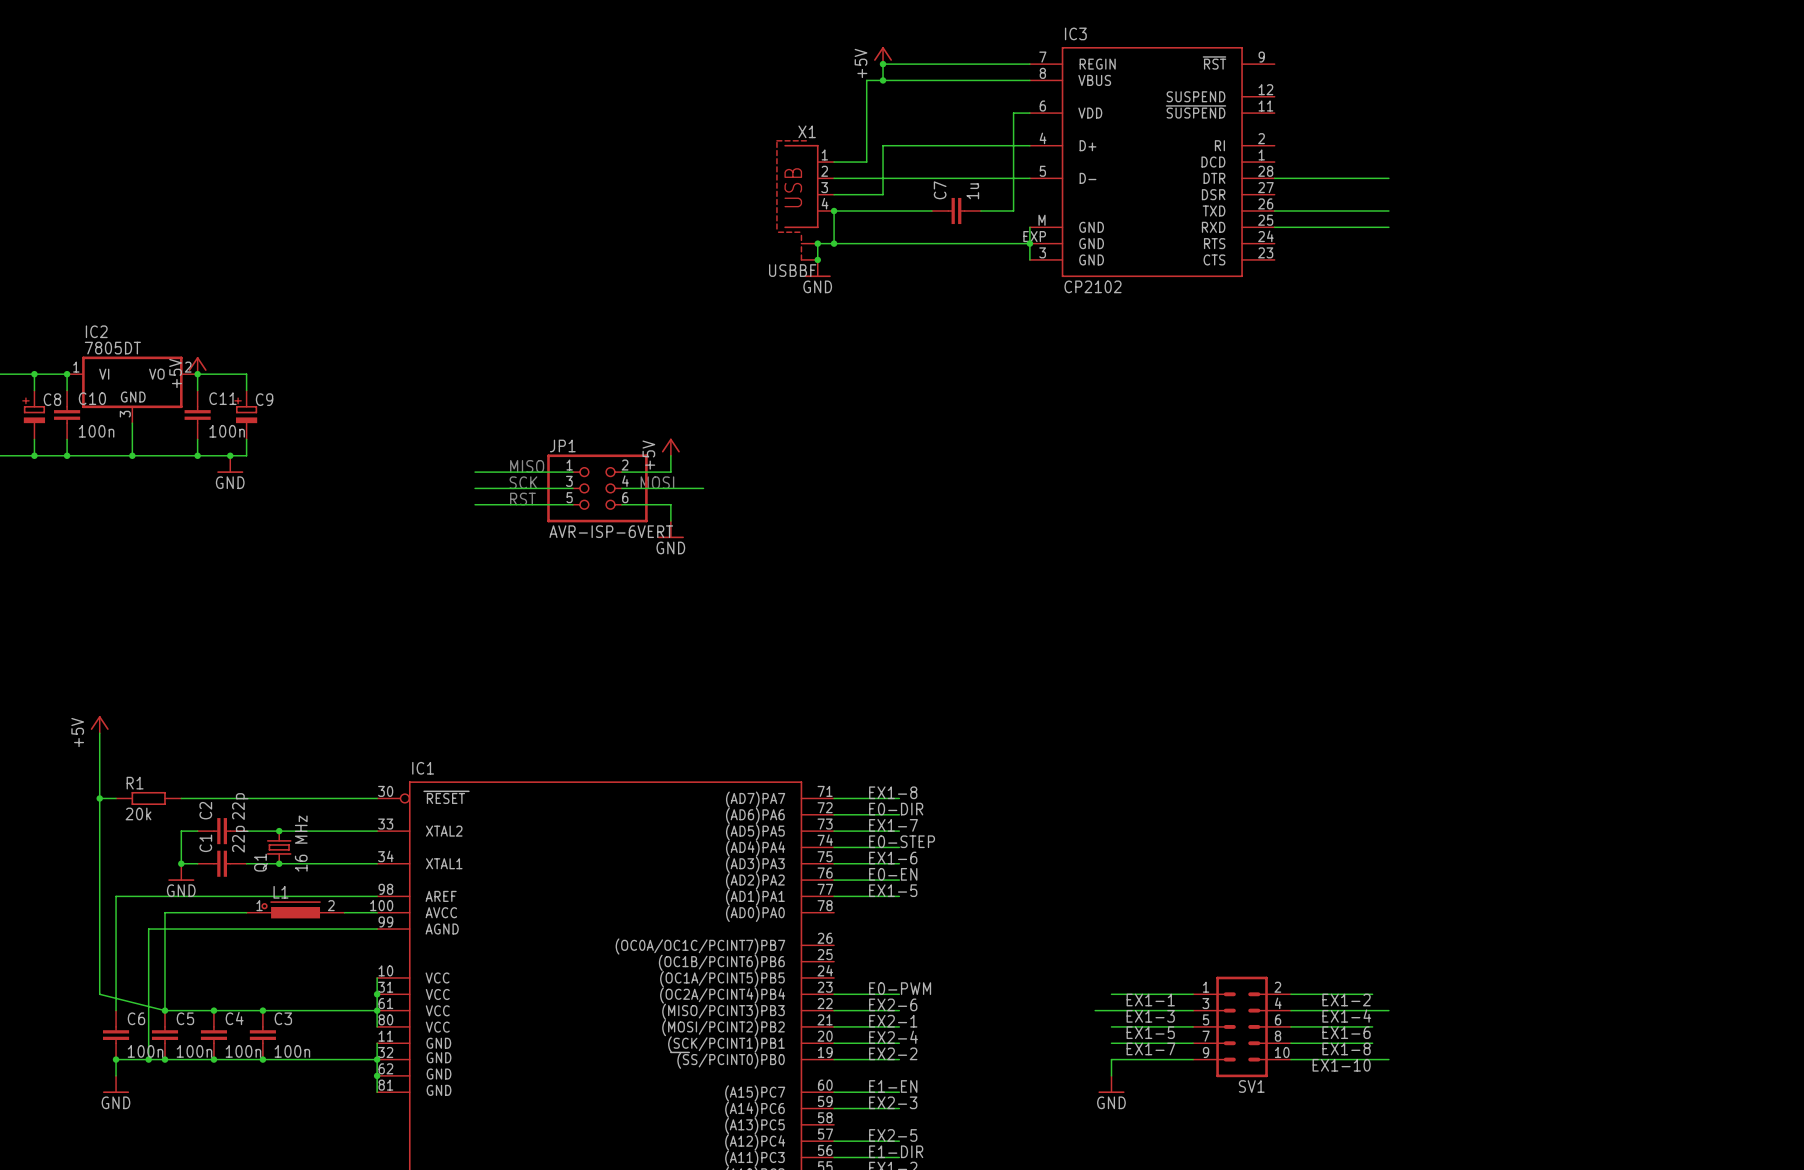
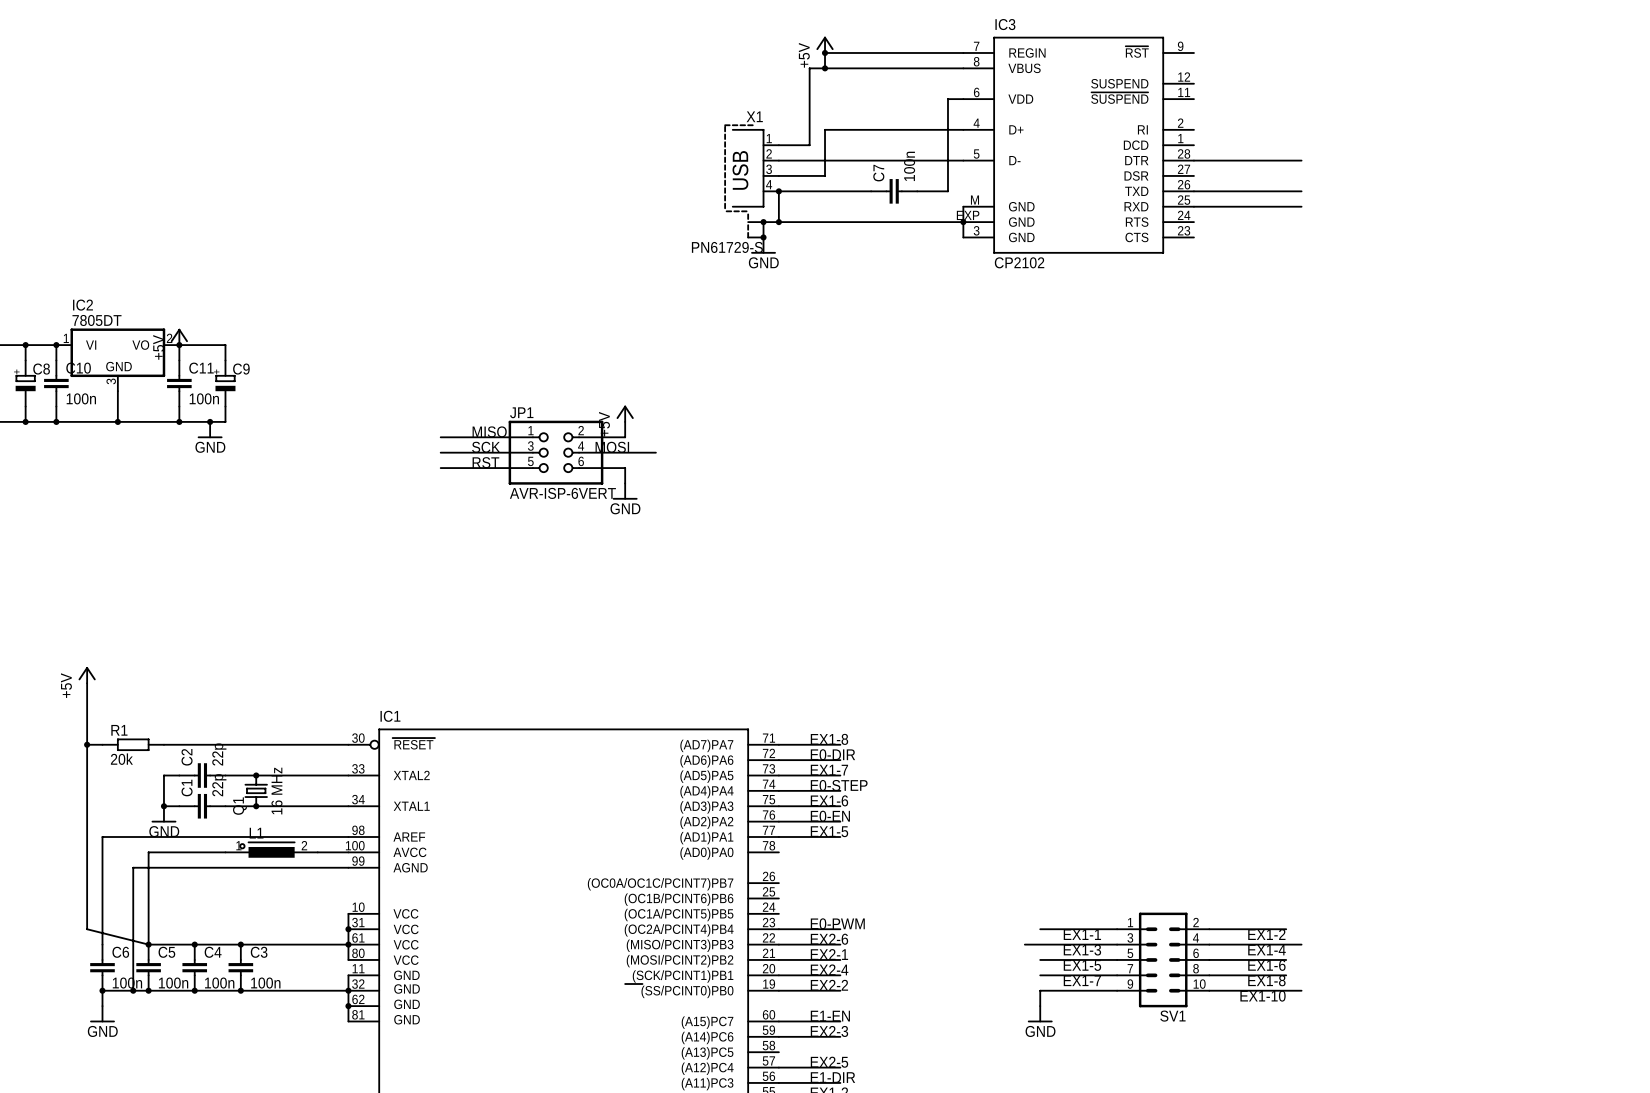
C7 value: 1u (972, 191) -> 100n (909, 166)
X1 value: USBBF (792, 270) -> PN61729-S (727, 247)

